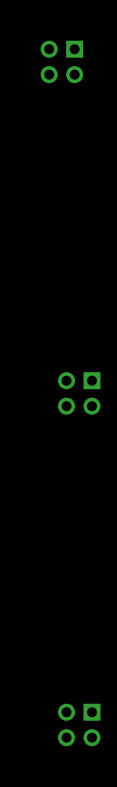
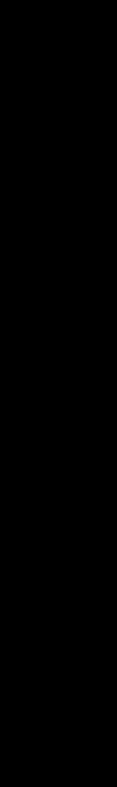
part: (61, 61) -> none
part: (79, 393) -> none
part: (79, 724) -> none

